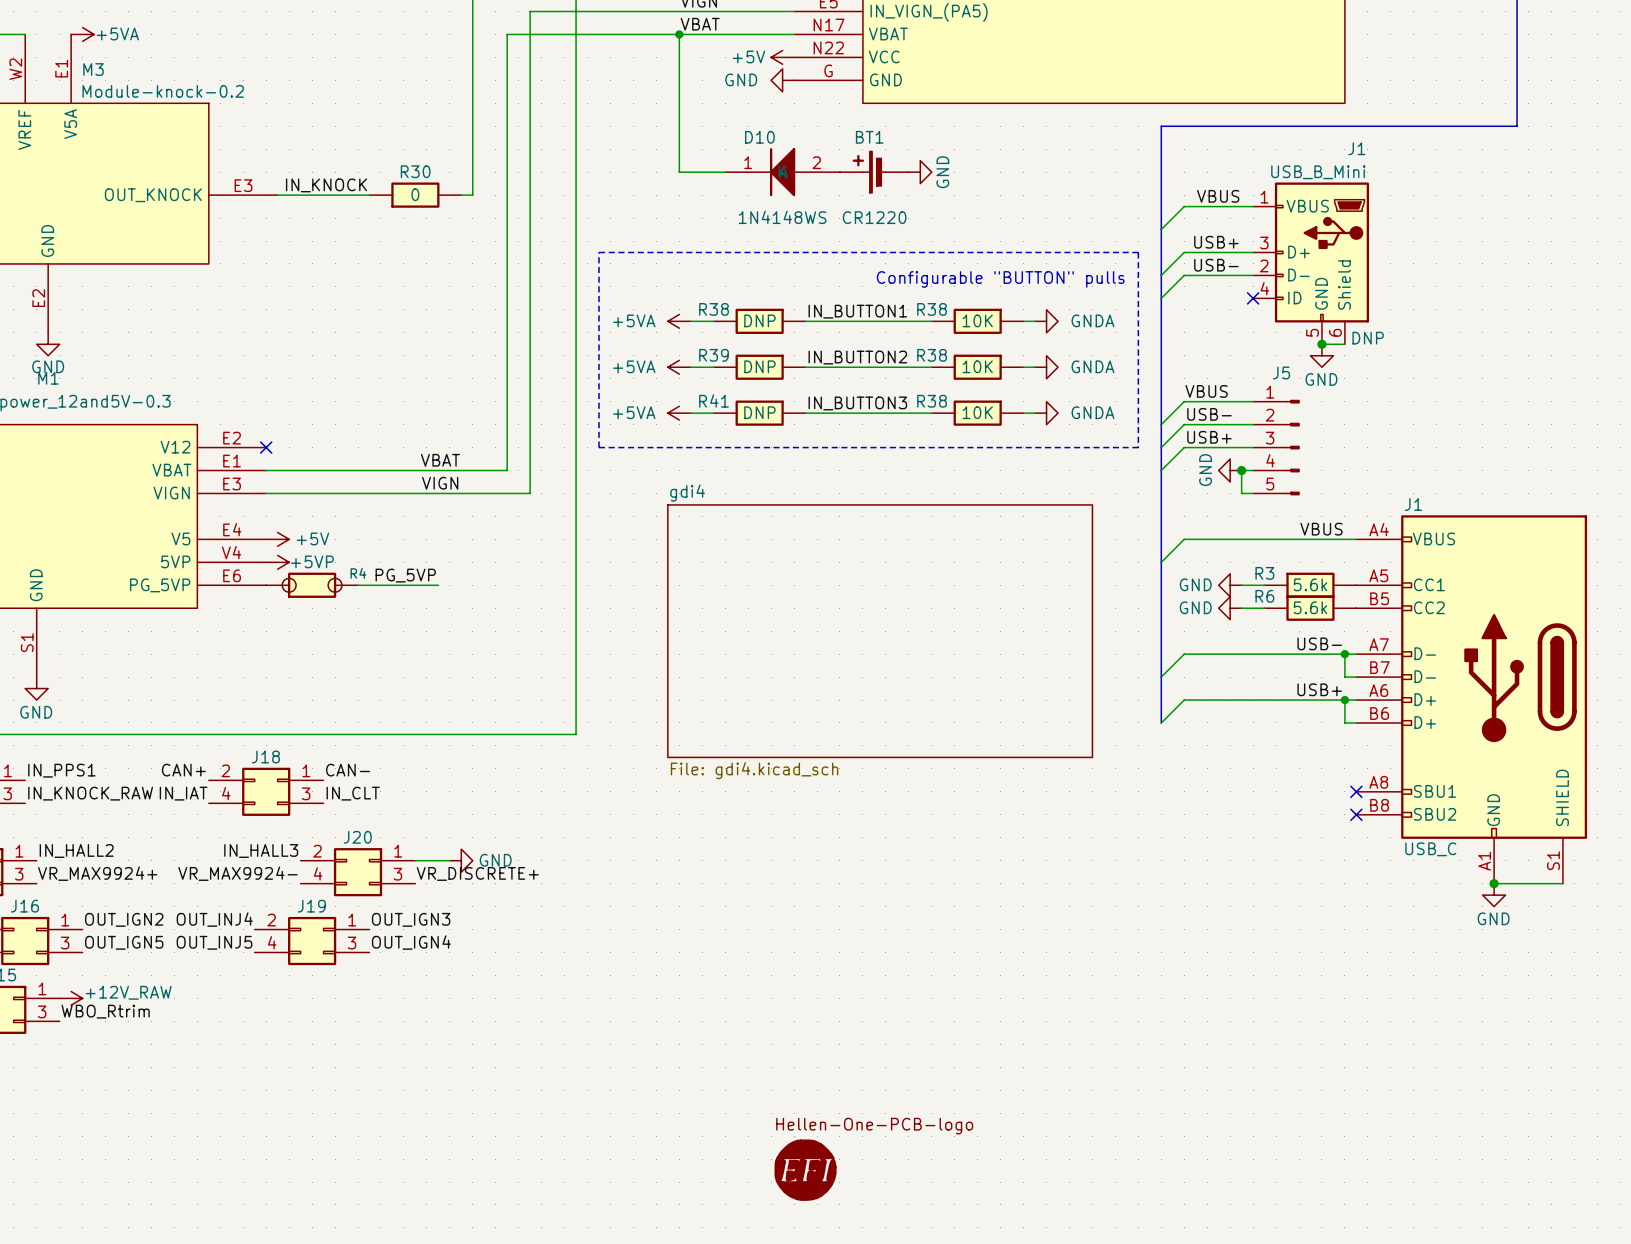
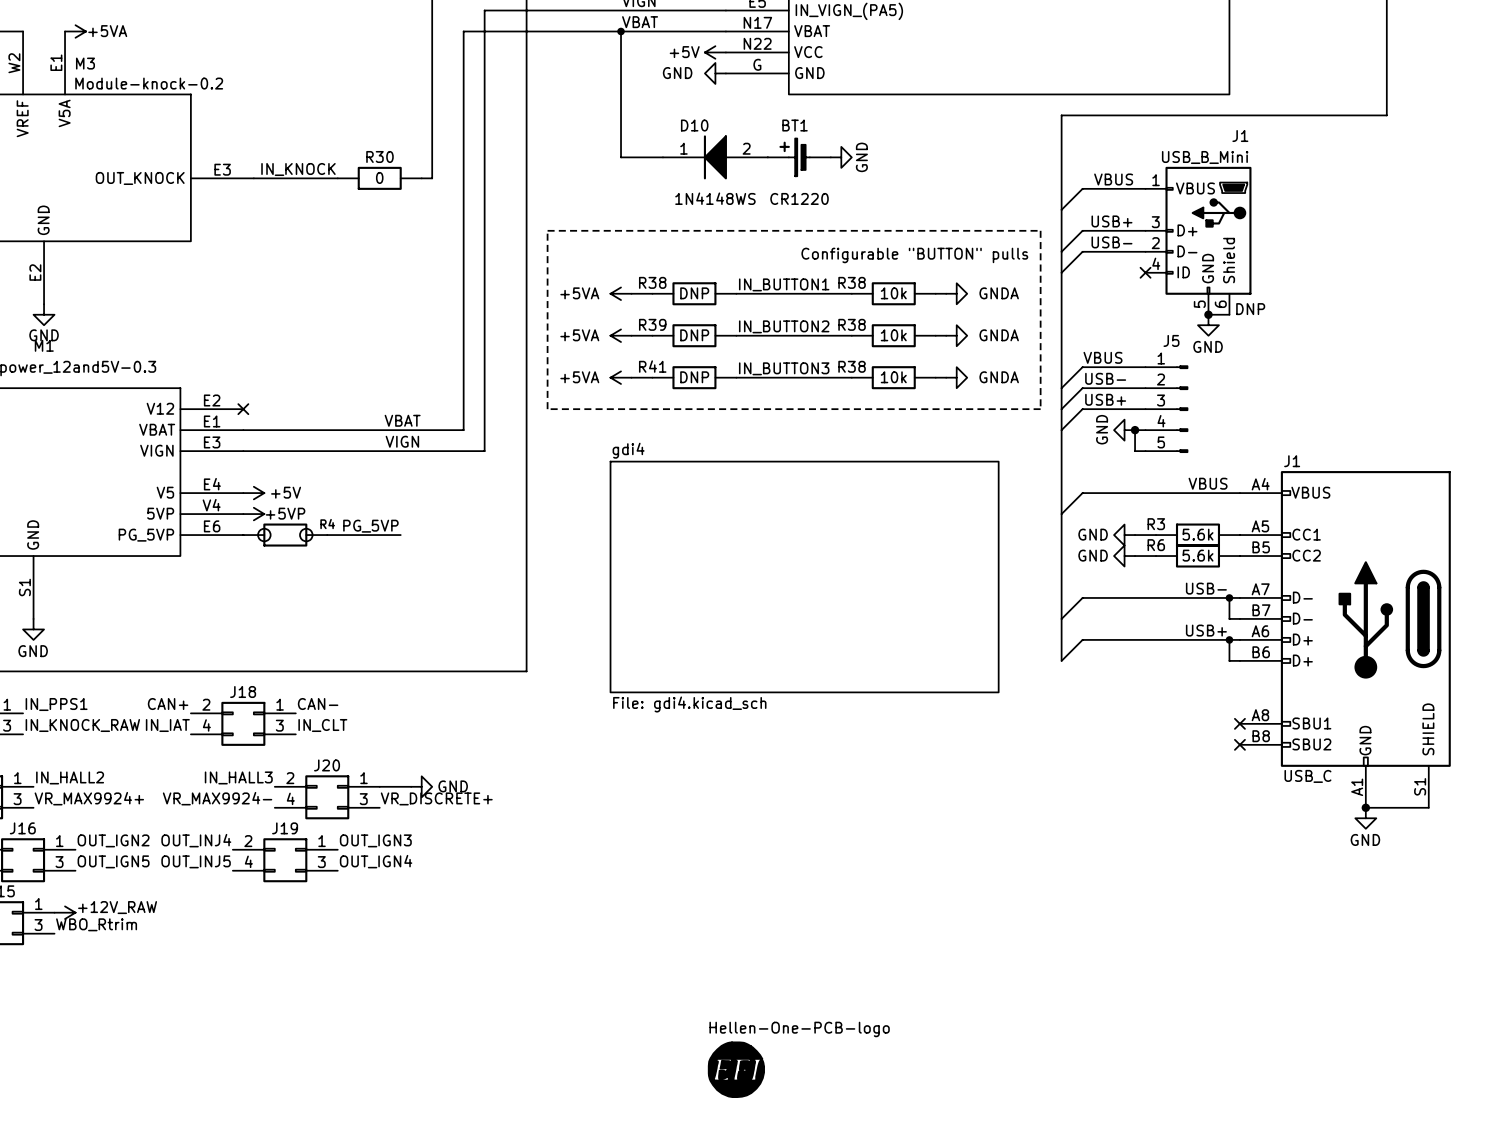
R38 value: 10K (977, 320) -> 10k (893, 293)
R38 value: 10K (977, 366) -> 10k (893, 335)
R38 value: 10K (977, 412) -> 10k (893, 377)

